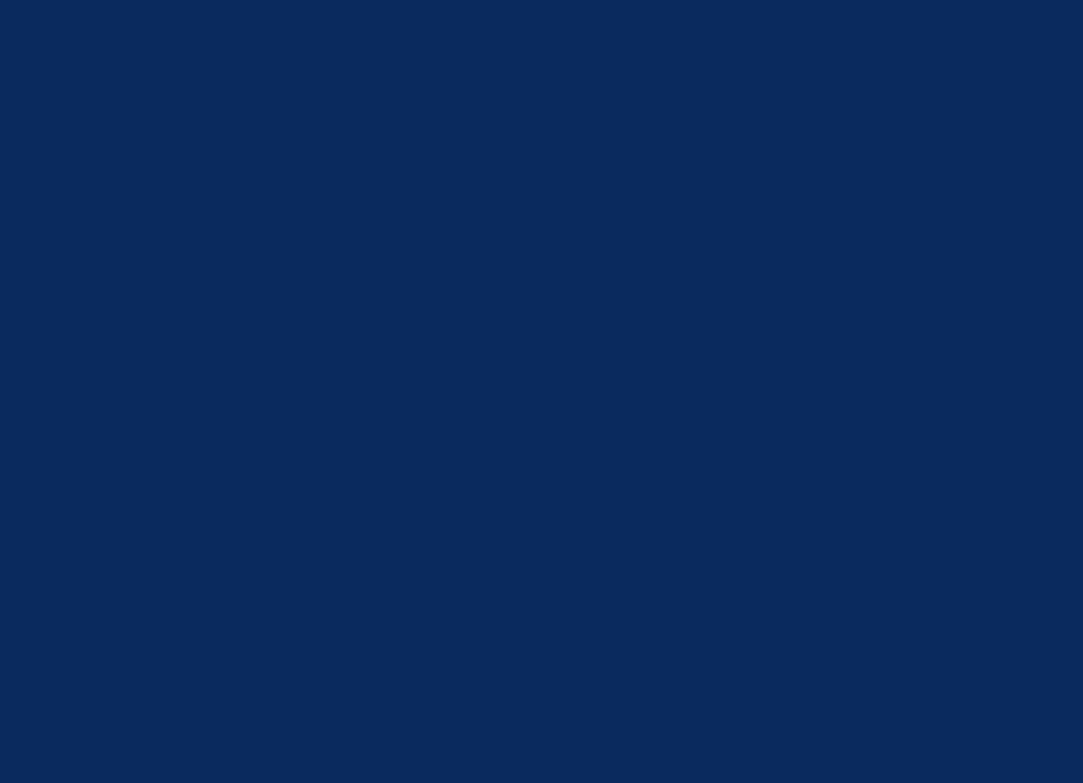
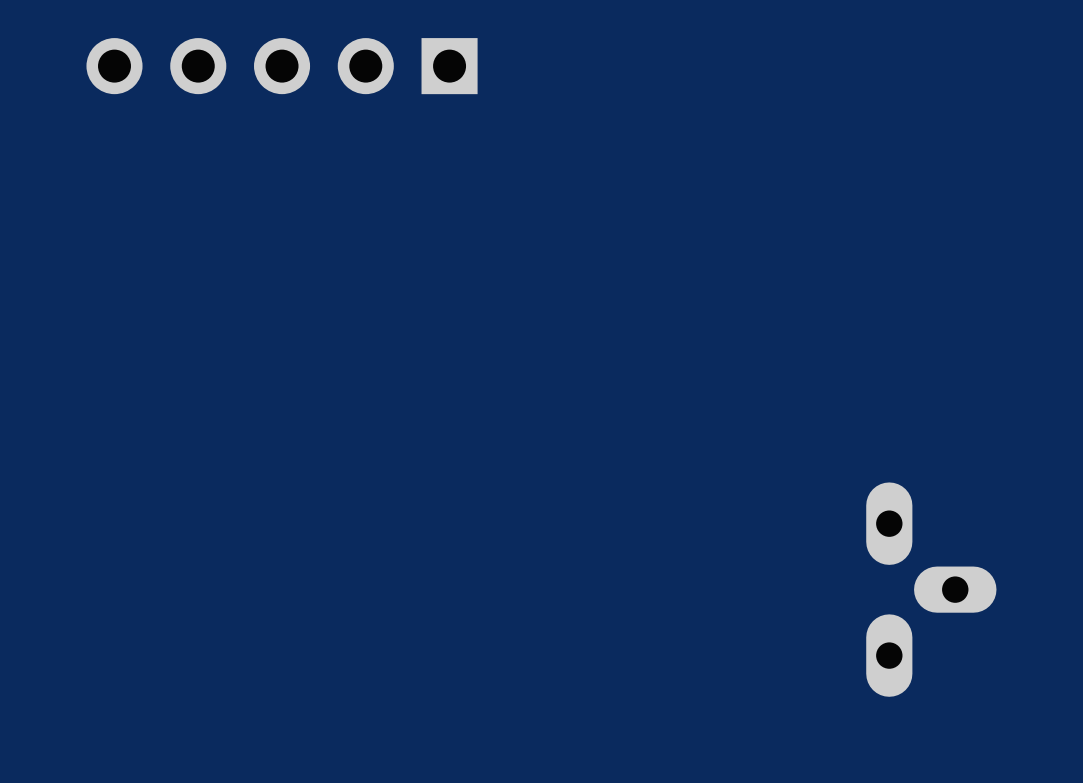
part: none -> (282, 66)
part: none -> (931, 589)

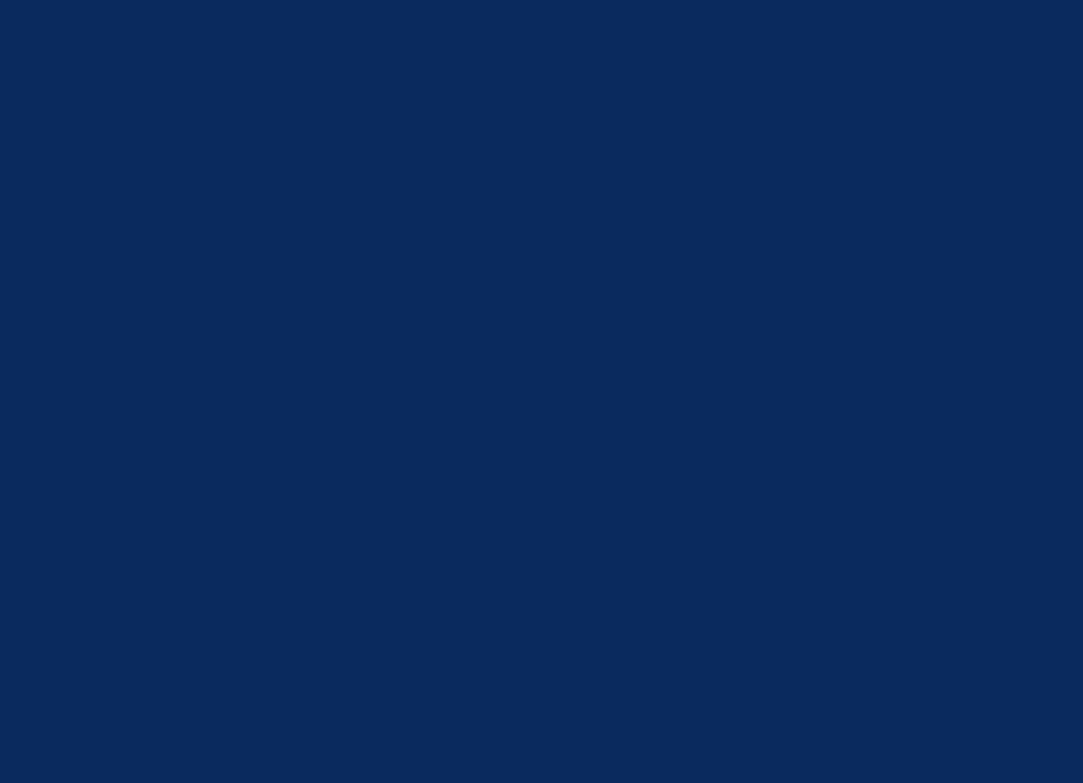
part: (282, 66) -> none
part: (931, 589) -> none

